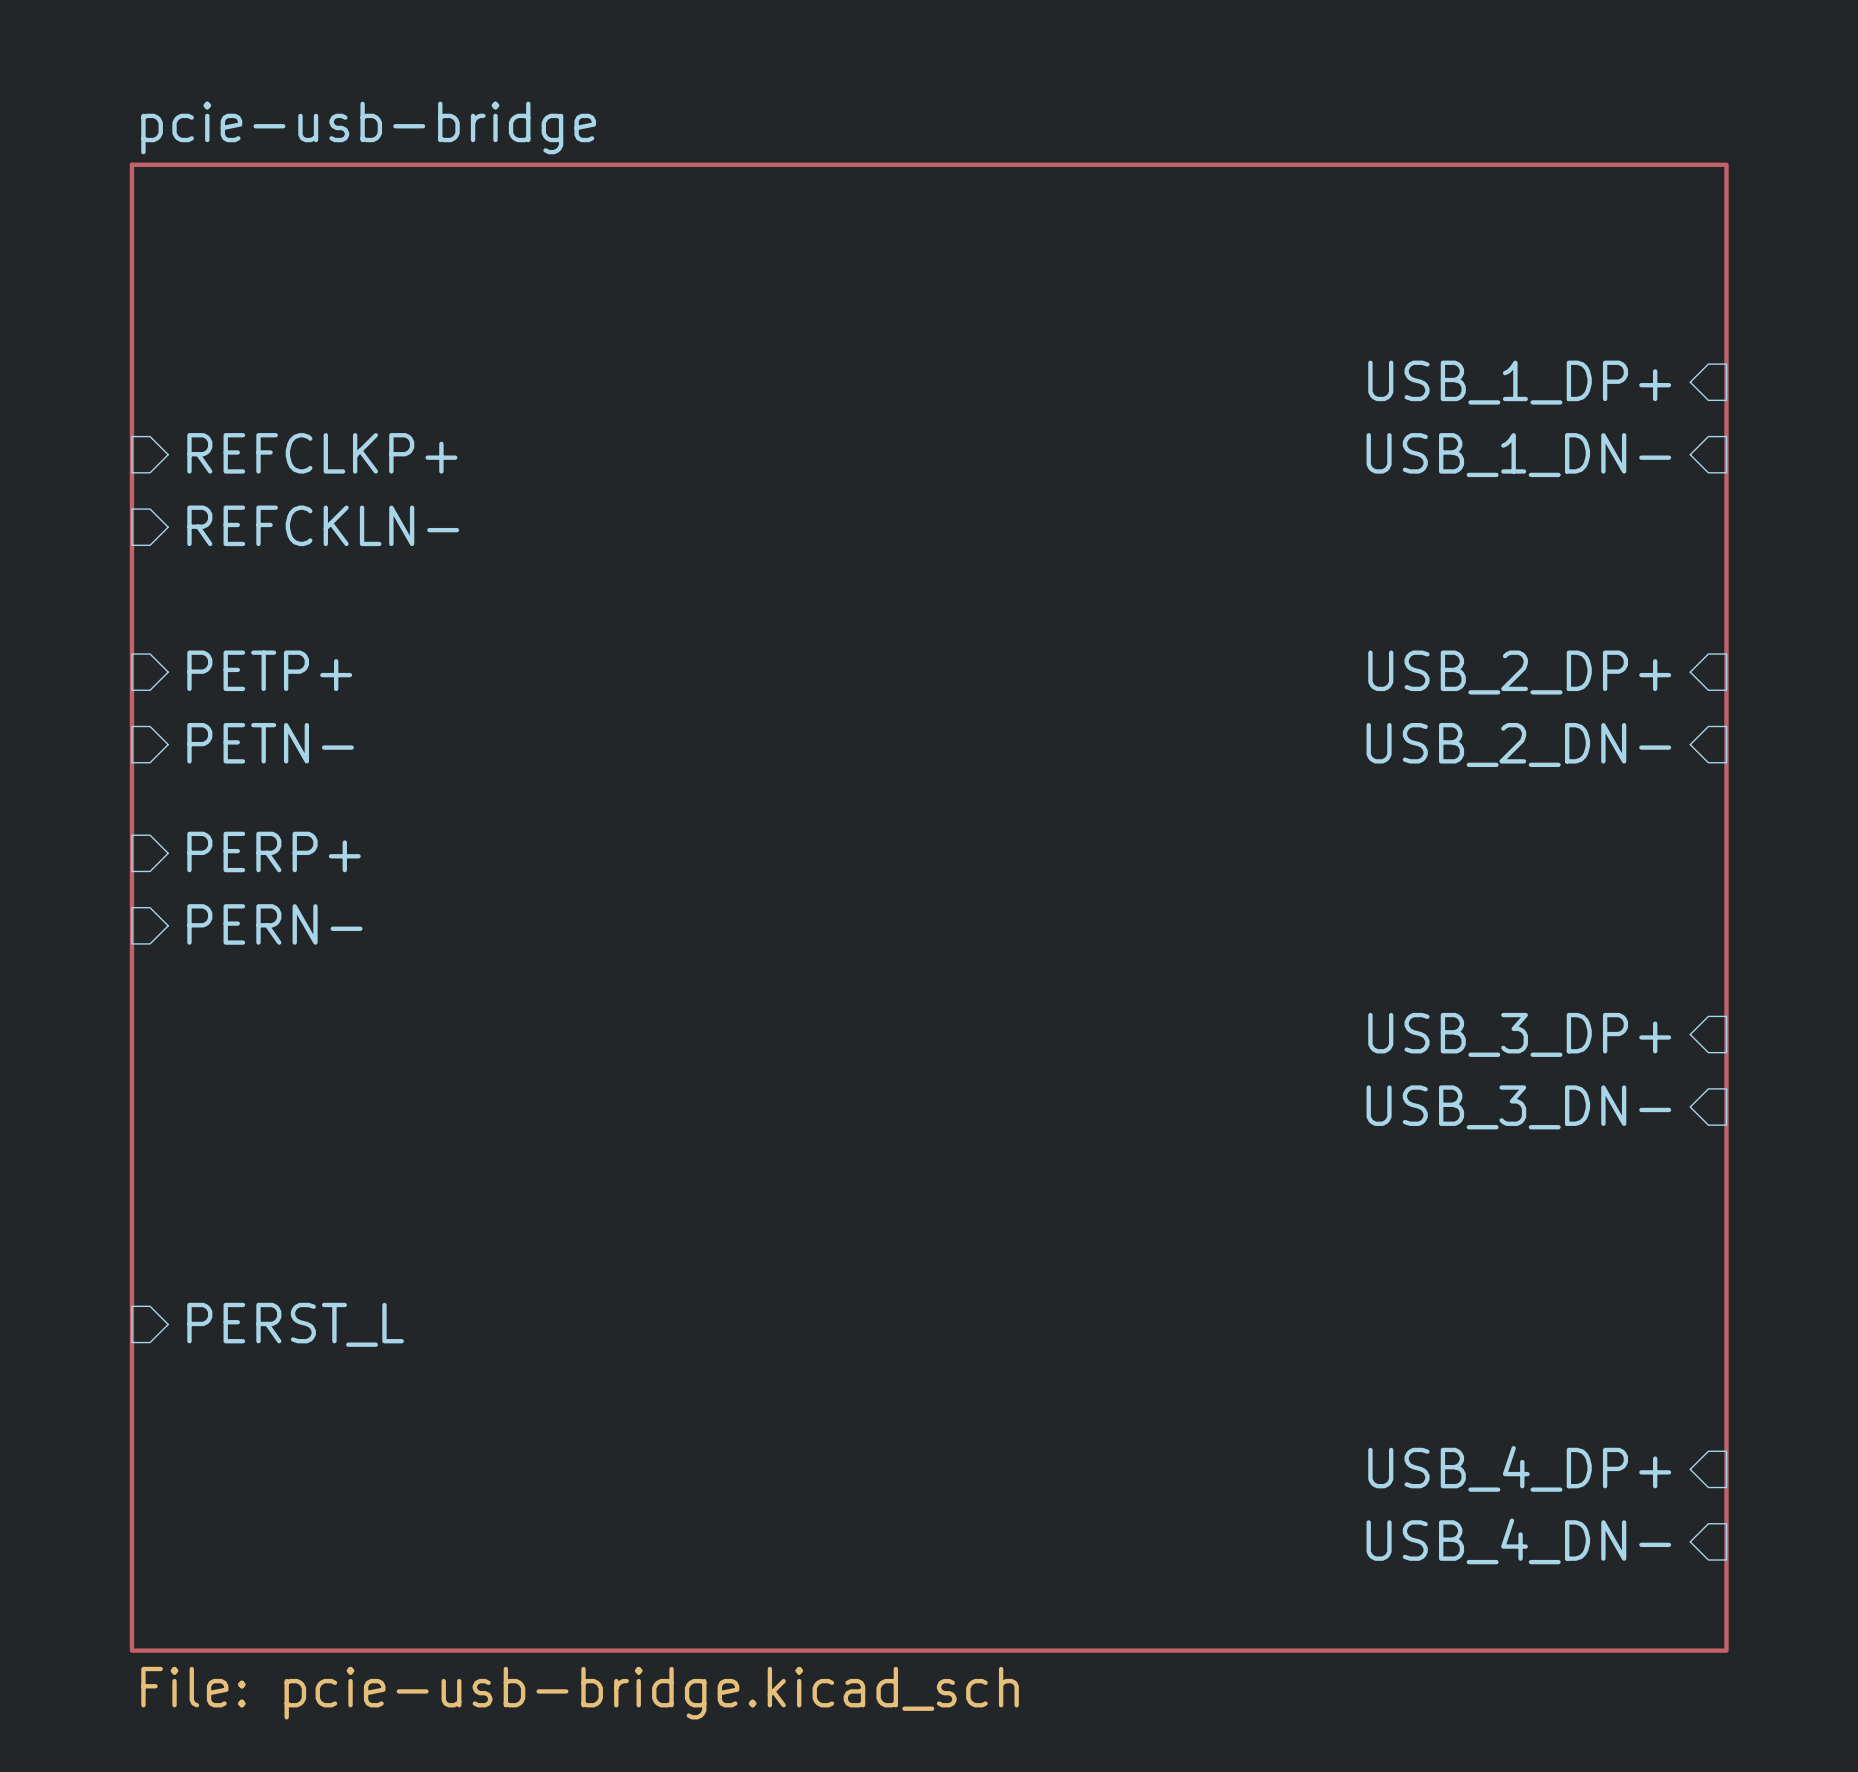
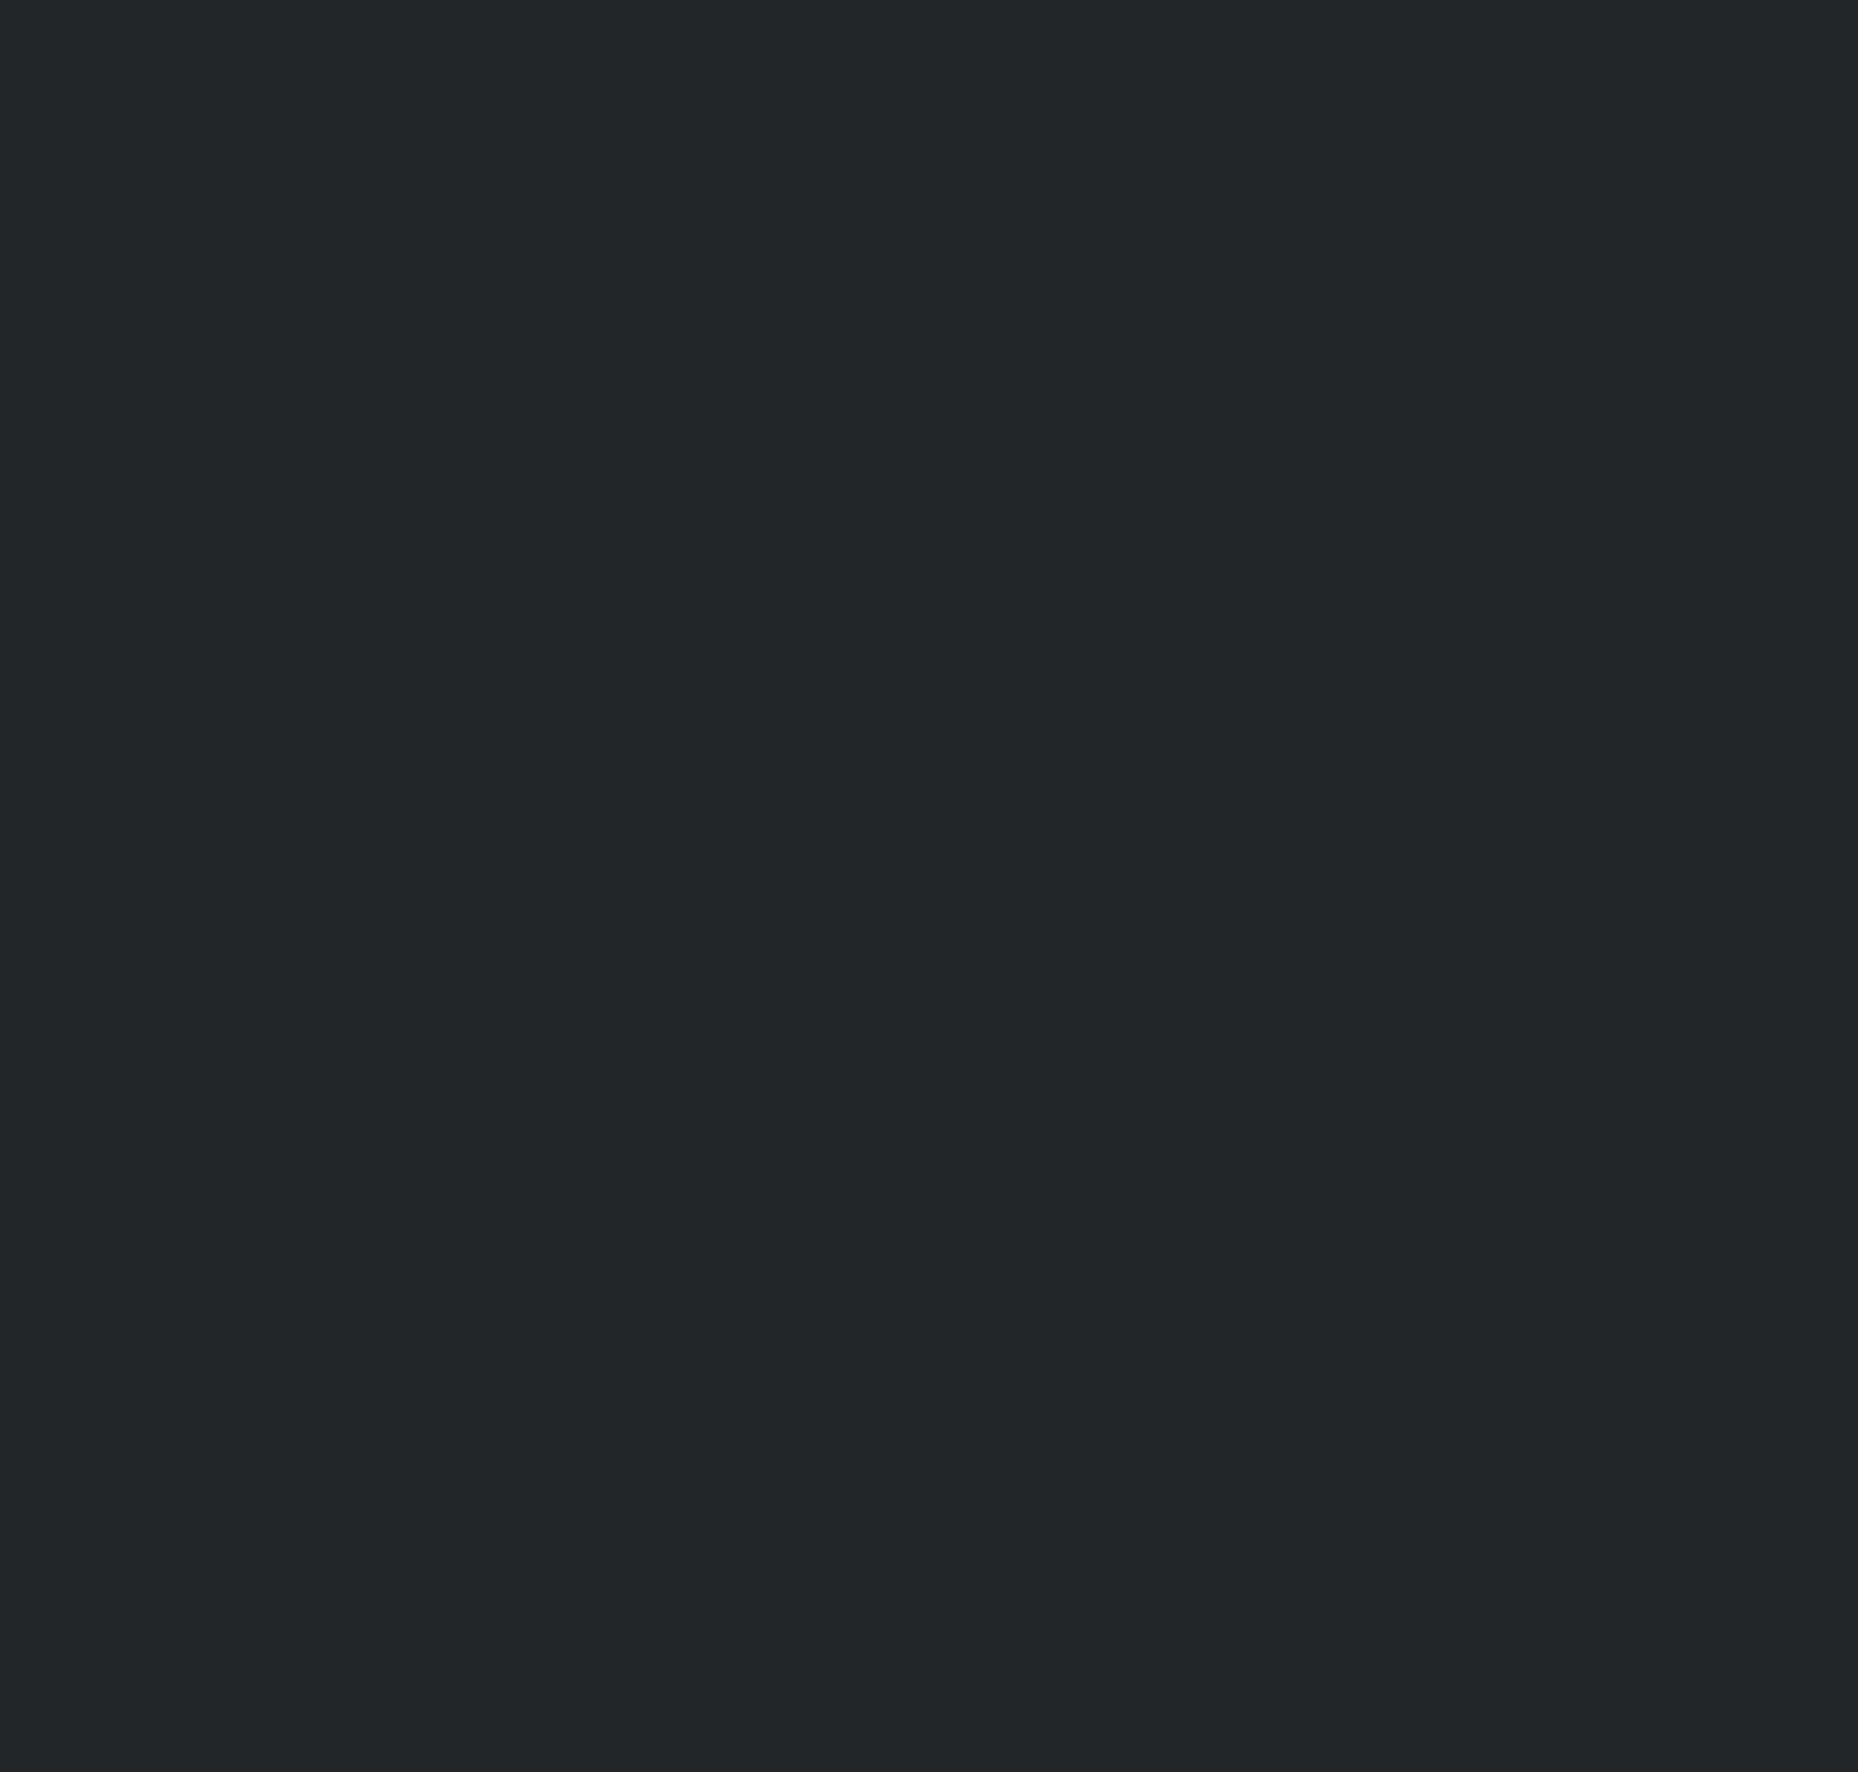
sheet pin: USB_1_DP+ (1519, 382) -> none
sheet pin: REFCLKP+ (322, 453) -> none
sheet pin: USB_1_DN- (1518, 455) -> none
sheet pin: REFCKLN- (323, 525) -> none
sheet pin: PETP+ (269, 670) -> none
sheet pin: USB_2_DP+ (1519, 672) -> none
sheet pin: PETN- (270, 743) -> none
sheet pin: USB_2_DN- (1518, 744) -> none
sheet pin: PERP+ (274, 851) -> none
sheet pcie-usb-bridge: File: pcie-usb-bridge.kicad_sch (929, 907) -> none
sheet pin: PERN- (274, 924) -> none
sheet pin: USB_3_DP+ (1519, 1034) -> none
sheet pin: USB_3_DN- (1518, 1107) -> none
sheet pin: PERST_L (295, 1324) -> none
sheet pin: USB_4_DP+ (1519, 1468) -> none
sheet pin: USB_4_DN- (1518, 1541) -> none

